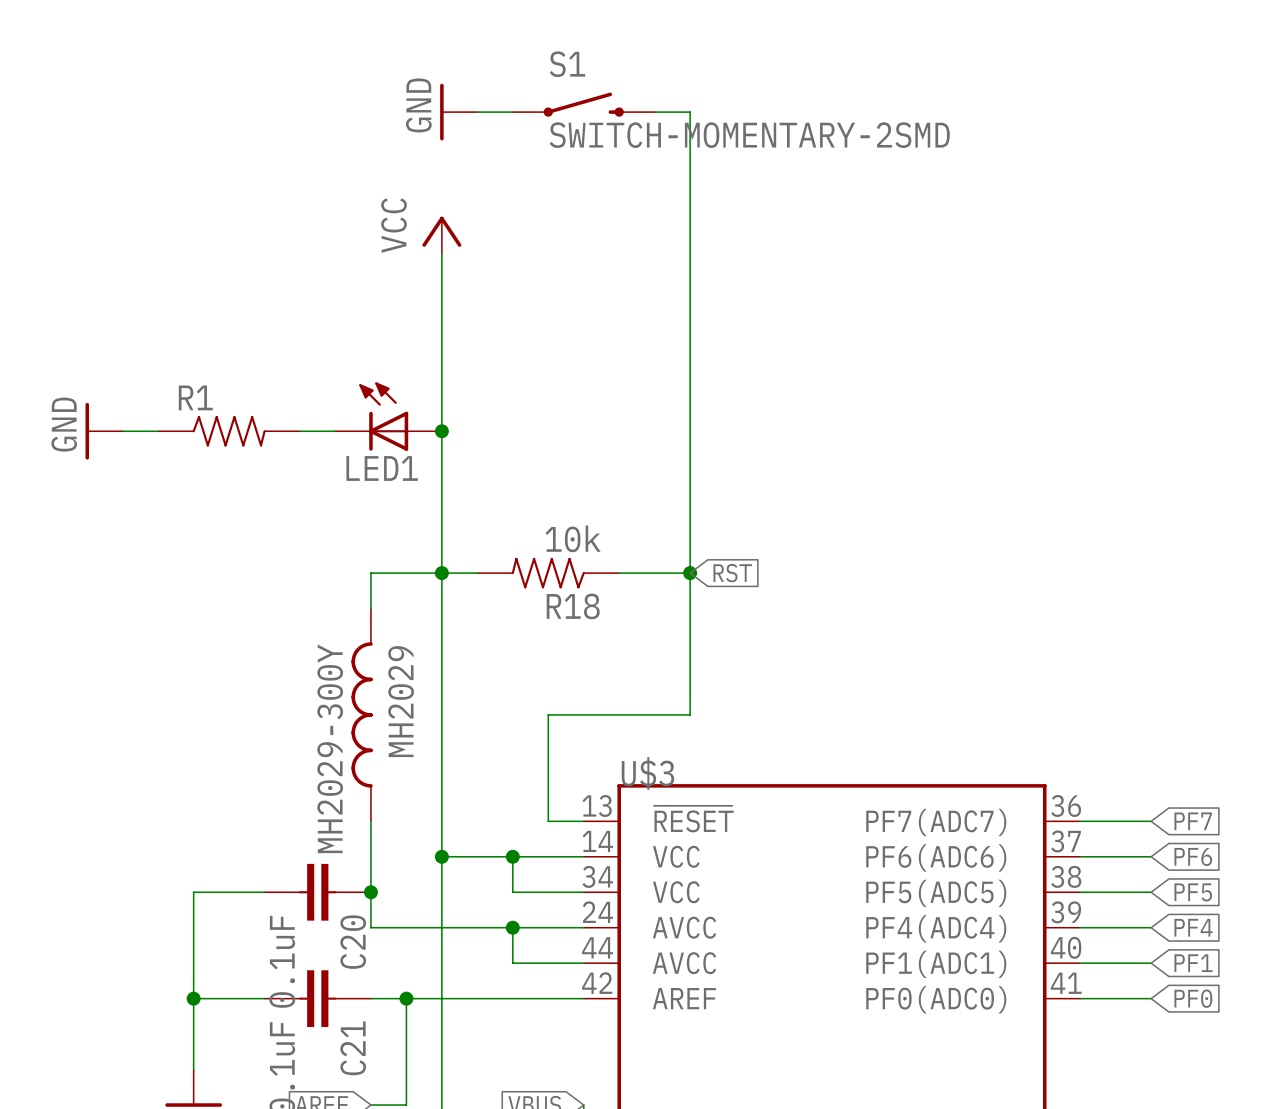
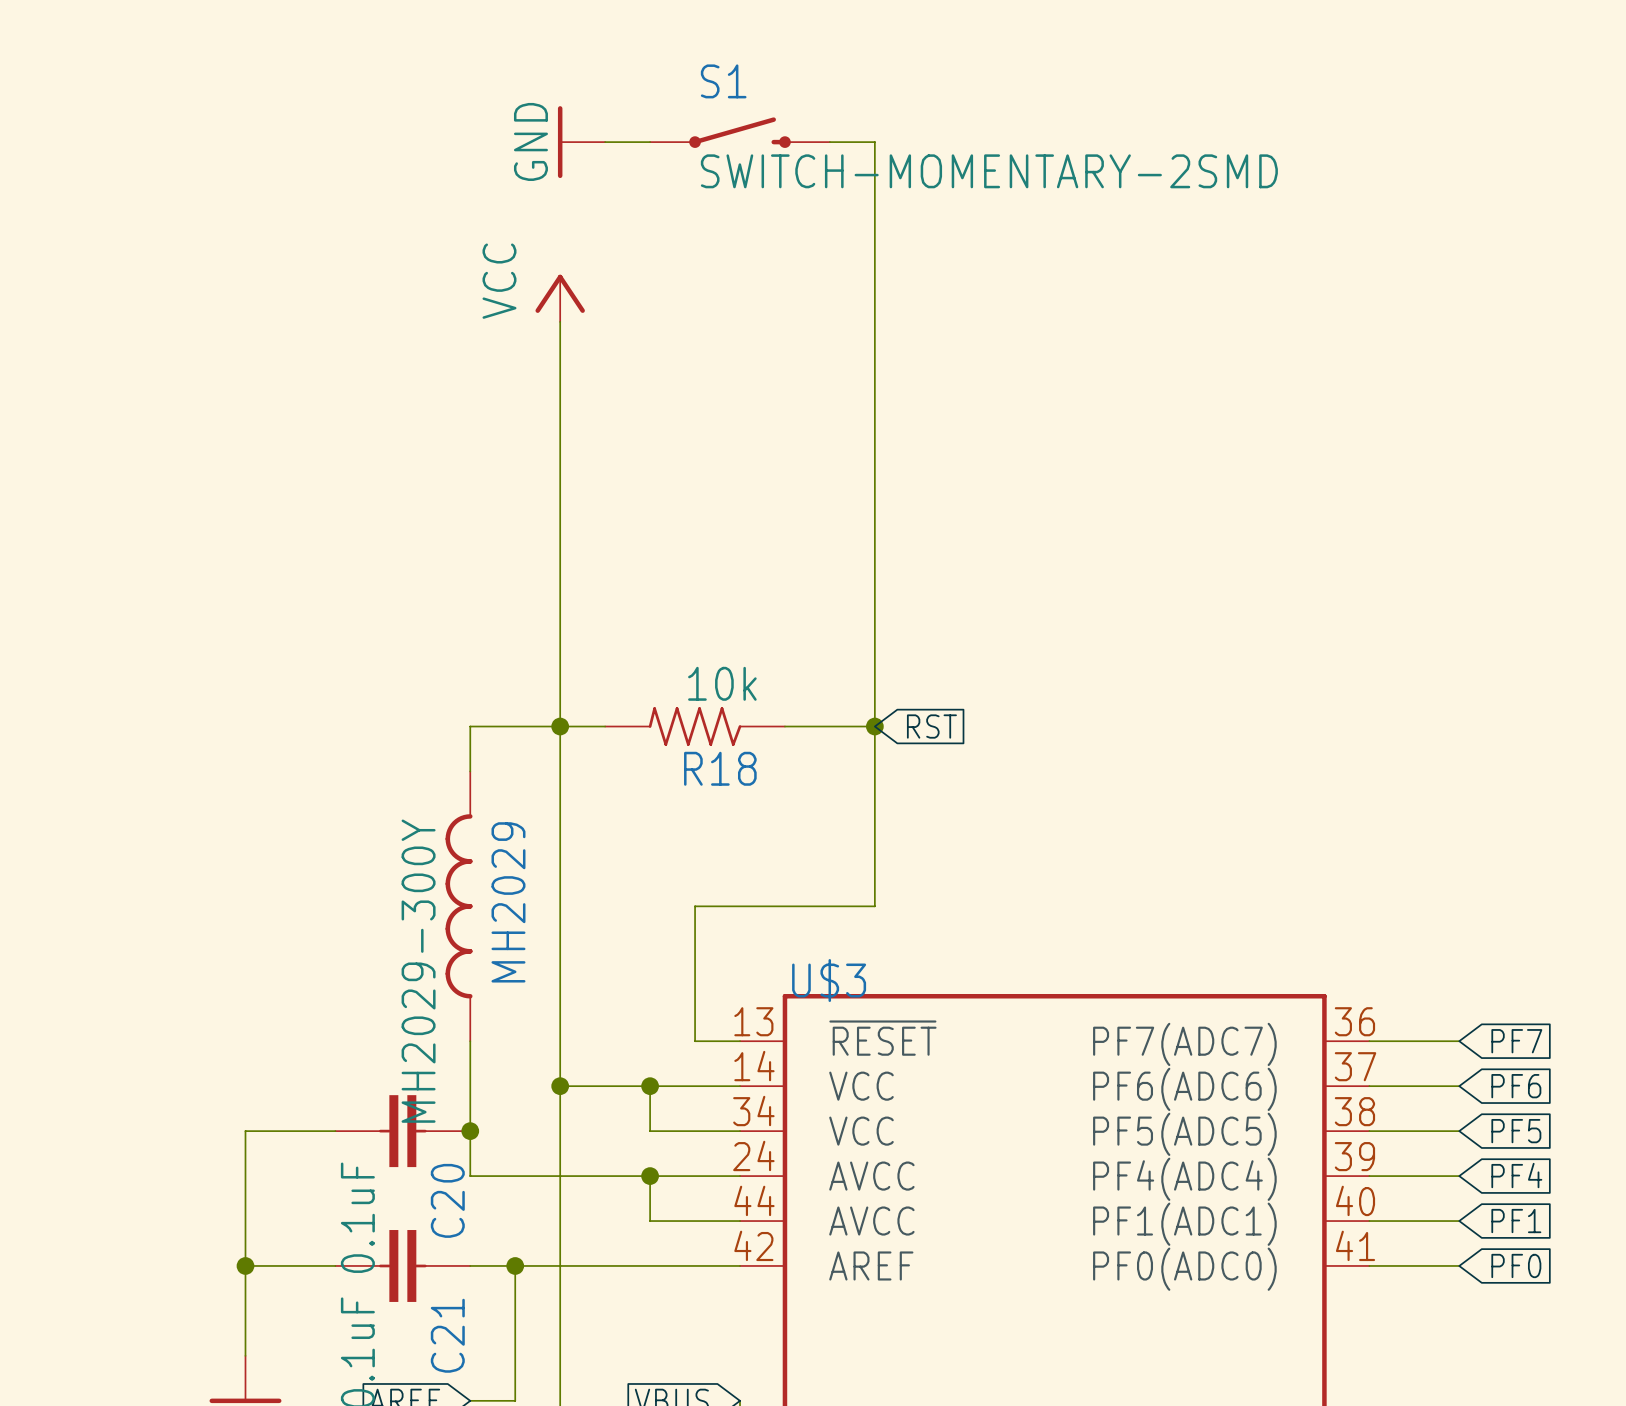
LED1: (388, 416) -> none
power symbol: GND (104, 431) -> none
wire: (122, 431) (158, 431) -> none
R1: (229, 431) -> none
wire: (300, 431) (335, 431) -> none
junction: (441, 431) -> none

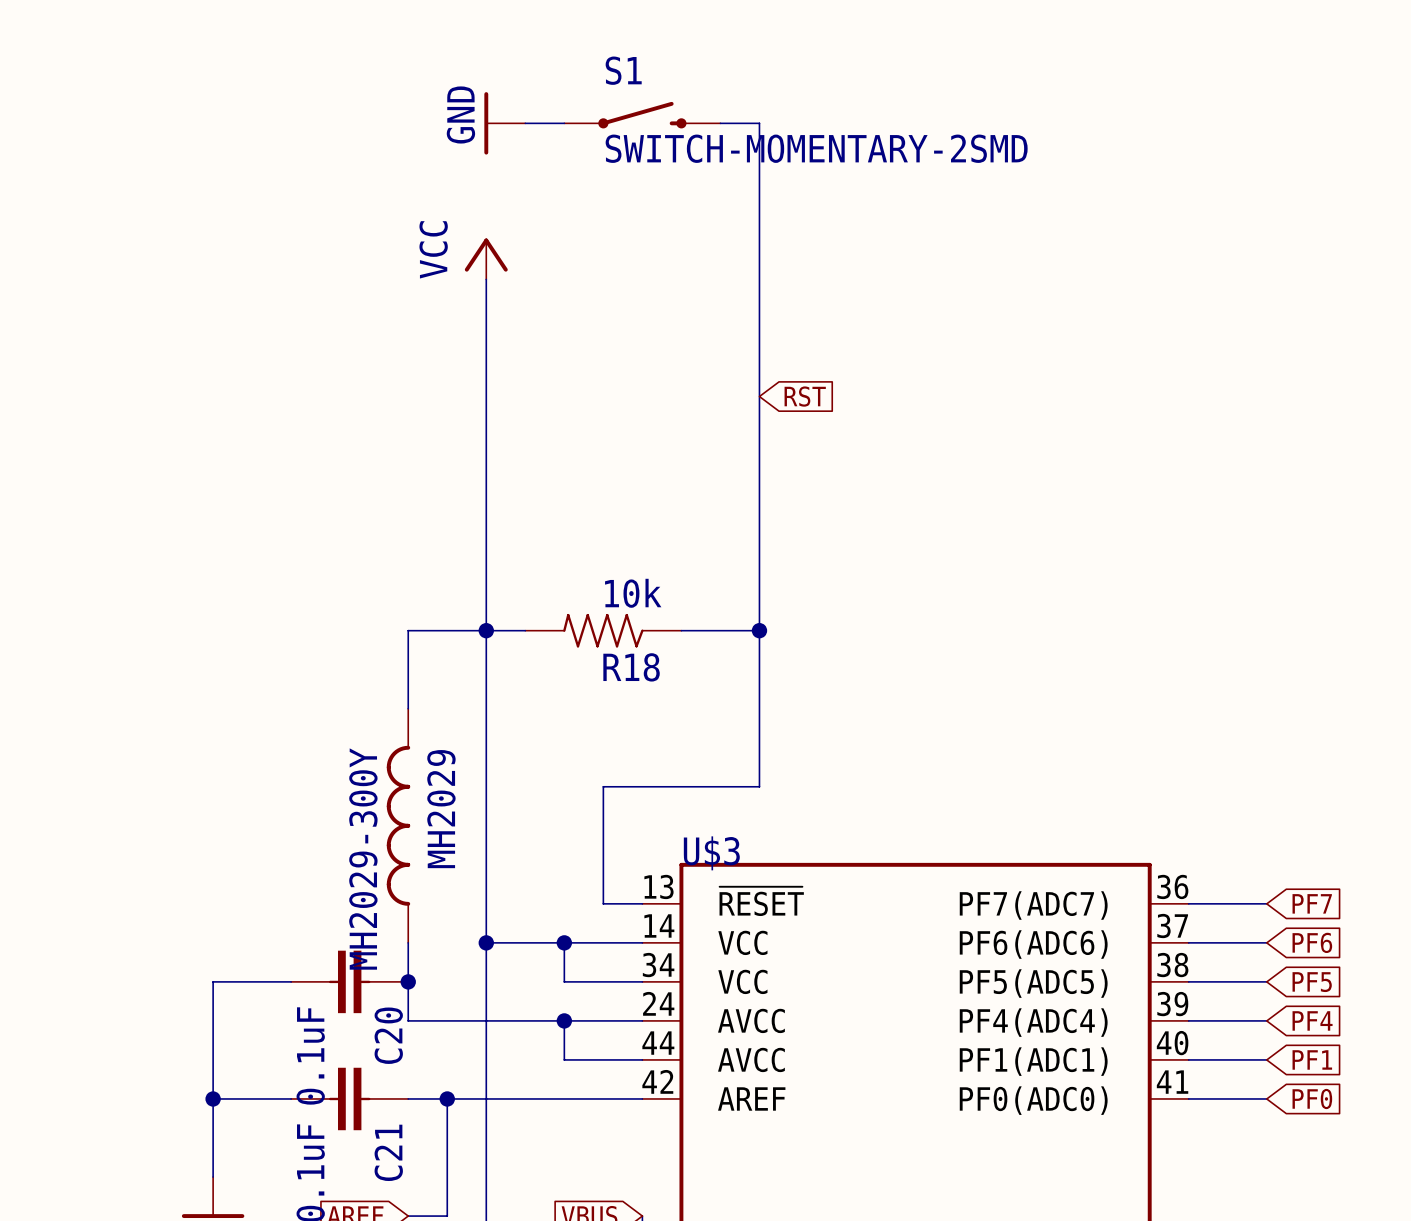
global label position: RST (931, 726) -> RST (805, 396)
MH2029 position: (459, 906) -> (398, 825)

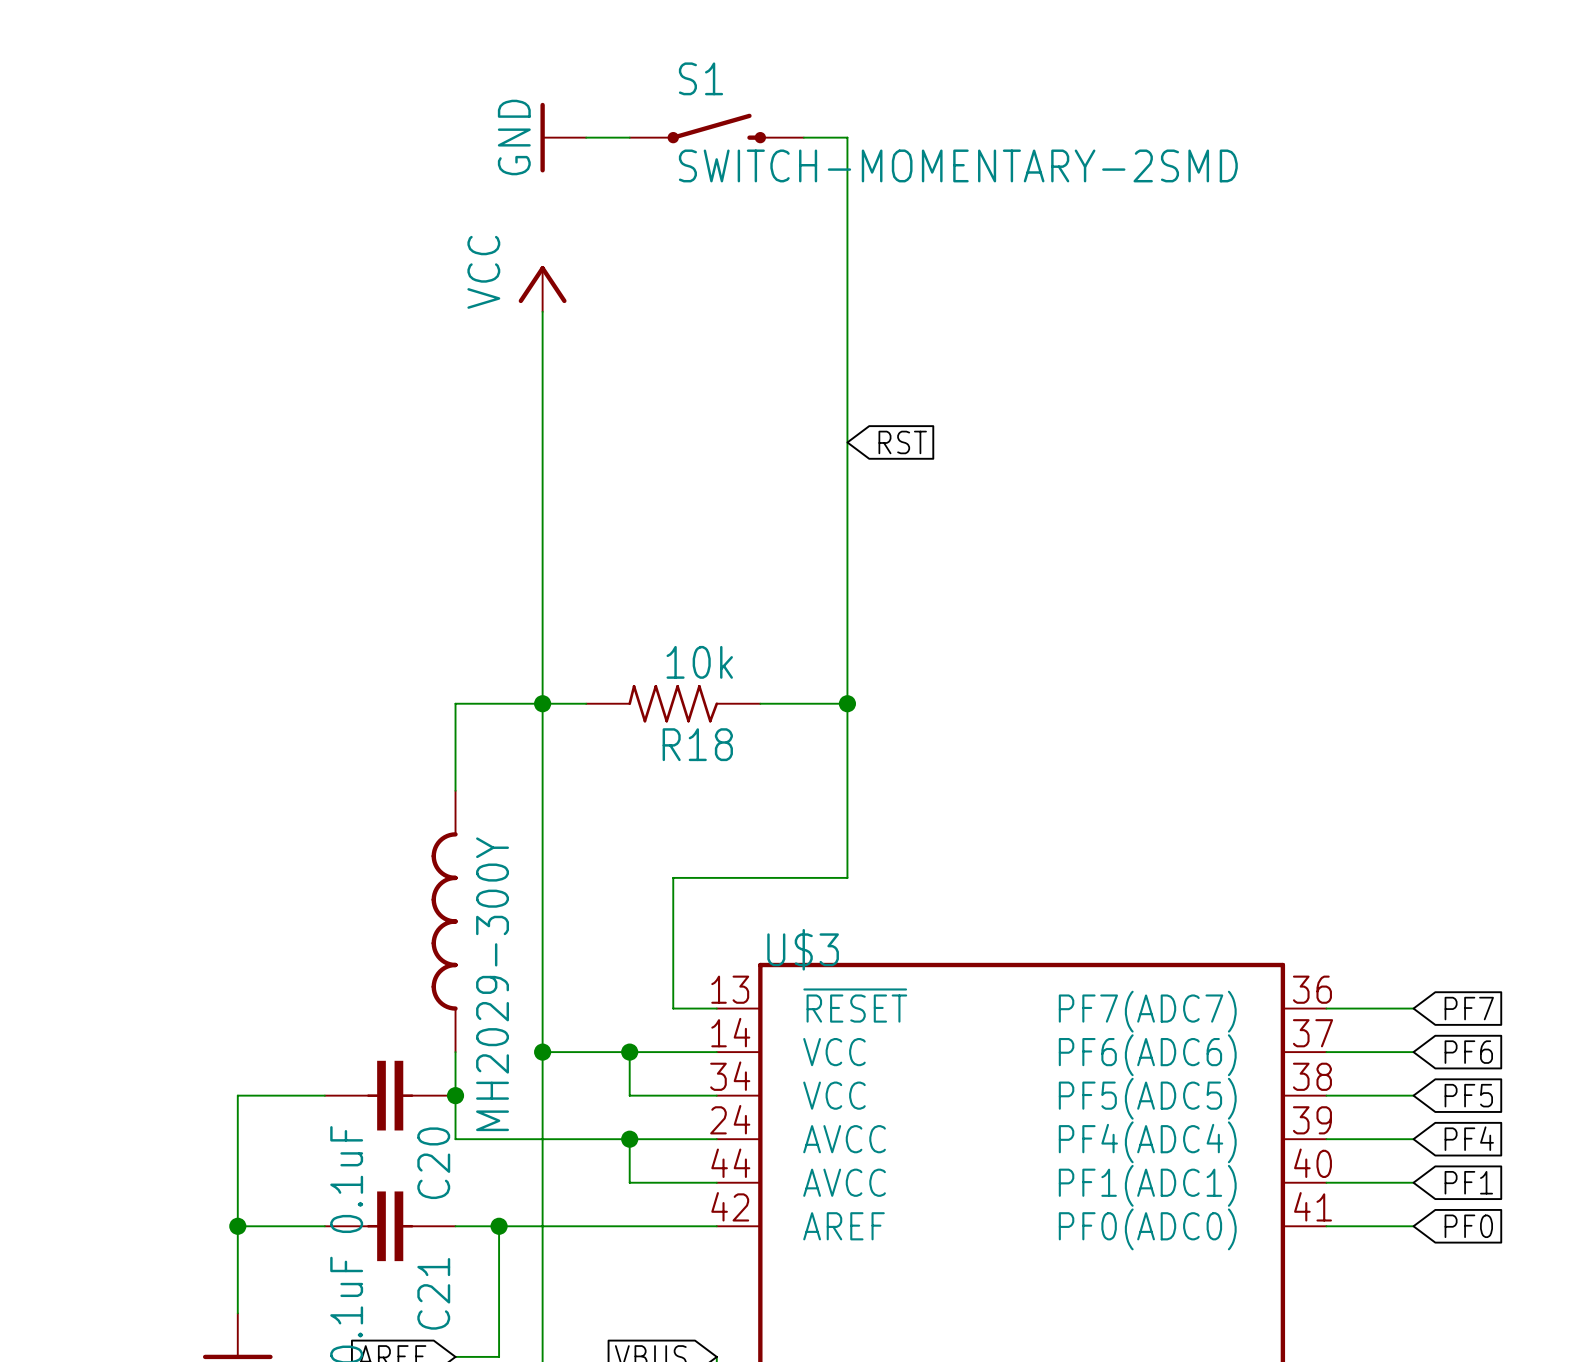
MH2029 name: MH2029 (441, 809) -> MH2029-300Y (492, 984)
MH2029 value: MH2029-300Y (363, 859) -> none

